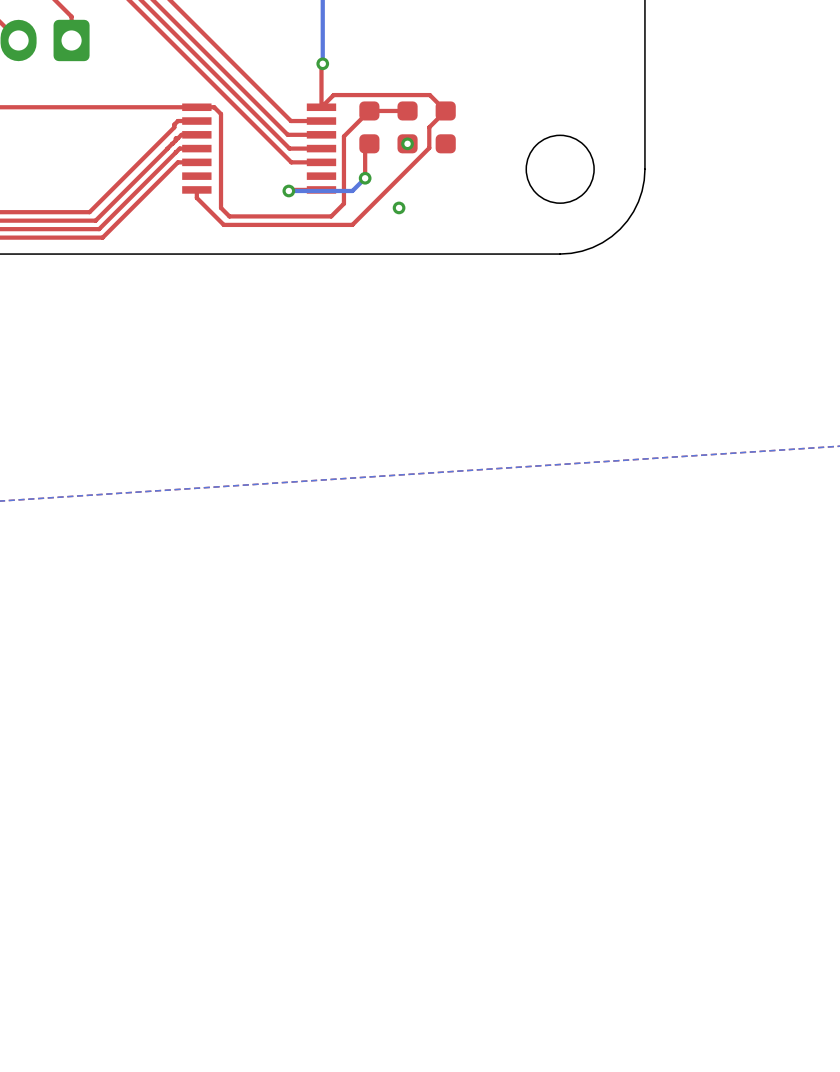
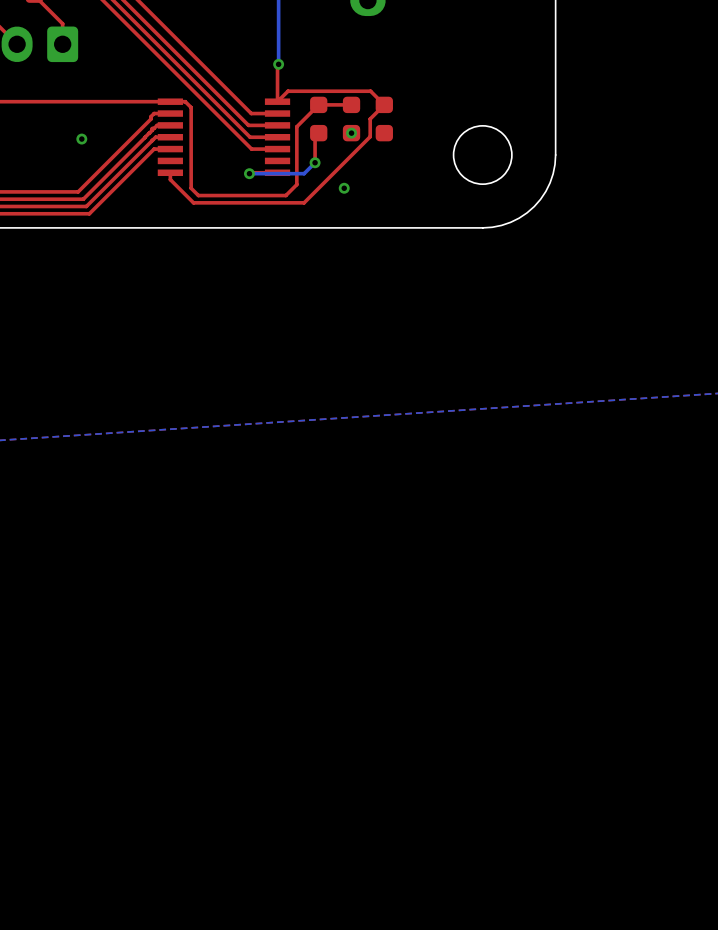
via: none -> (81, 139)

